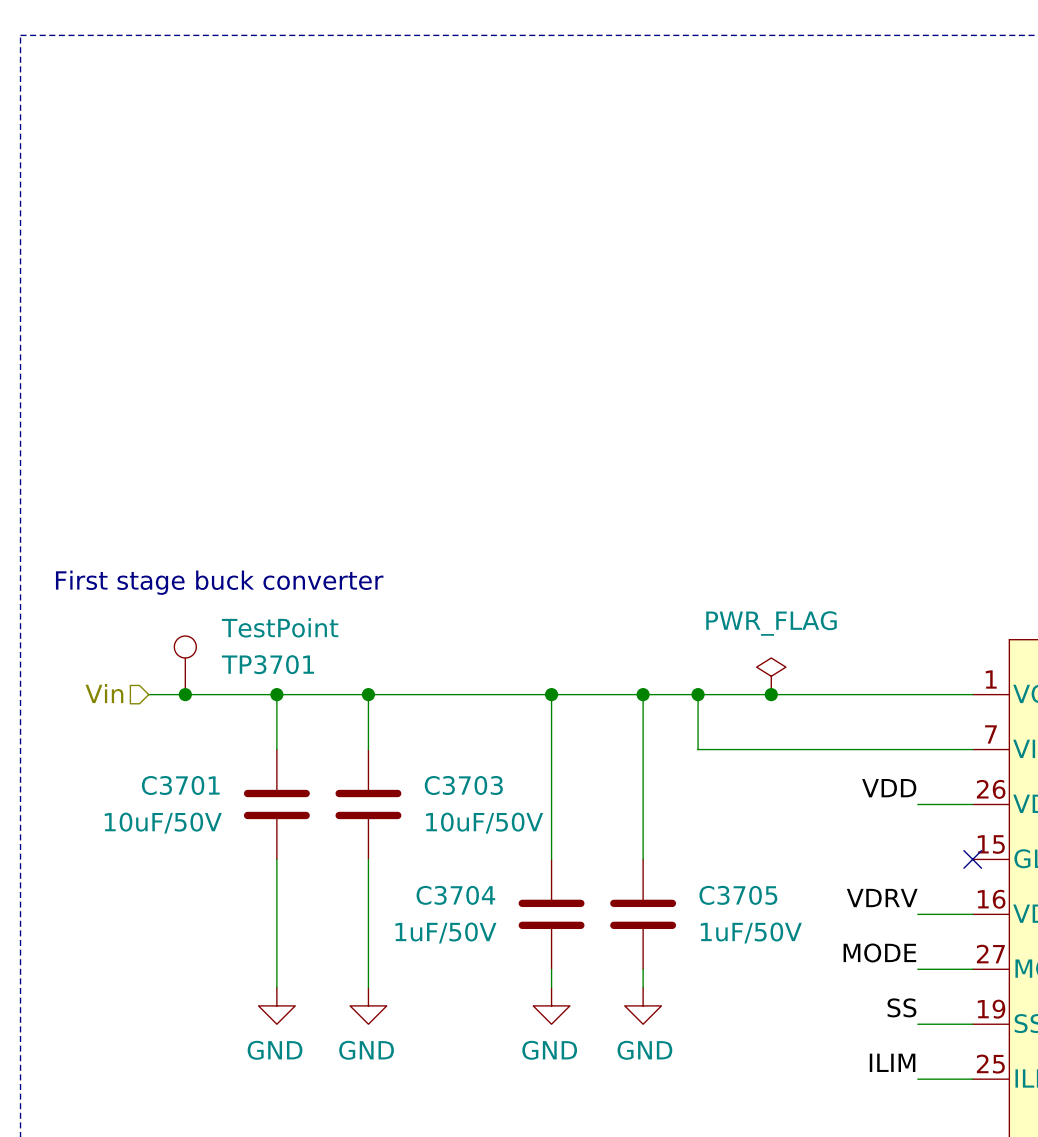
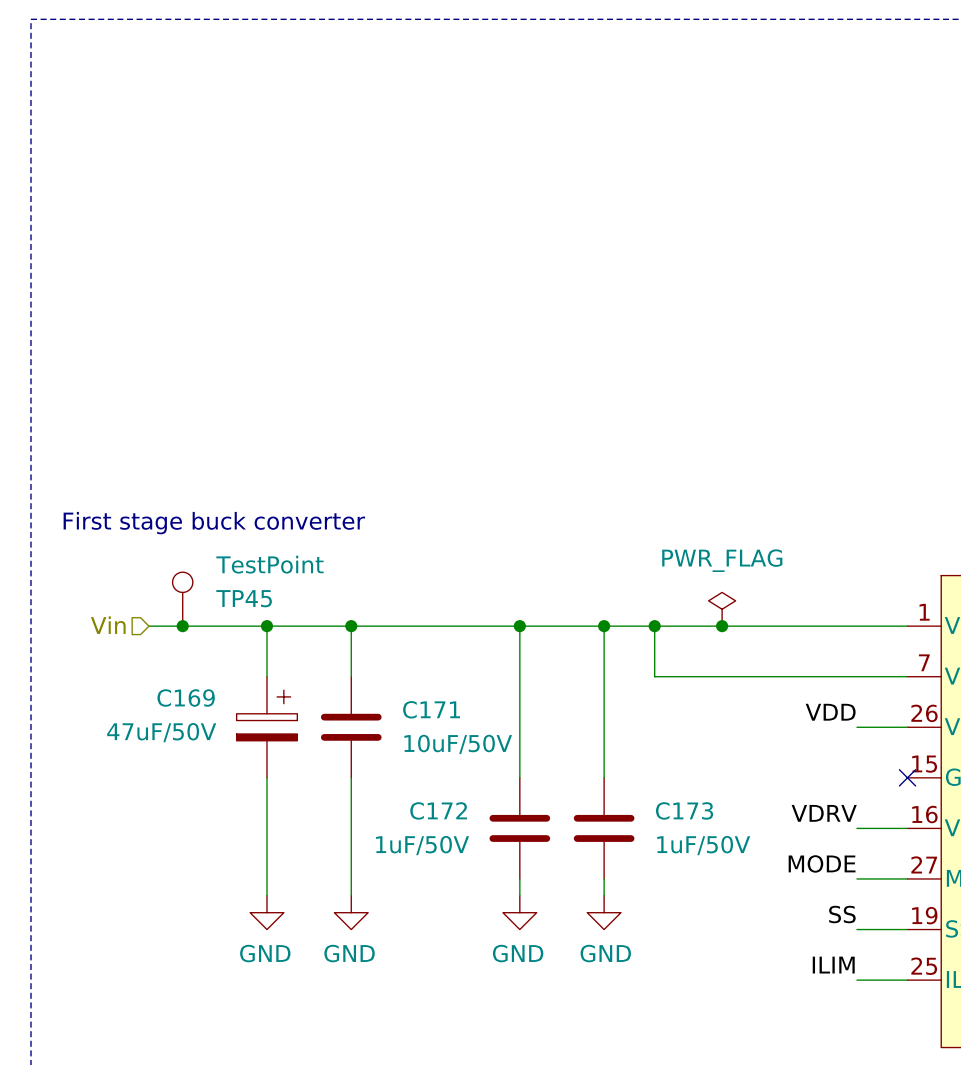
TP3701 name: TP3701 (267, 664) -> TP45 (244, 598)
C3703 name: C3703 (463, 785) -> C171 (431, 709)
C3701: 10uF/50V (276, 804) -> none
C169: none -> 47uF/50V (266, 727)
C3704 name: C3704 (455, 895) -> C172 (438, 810)
C3705 name: C3705 (738, 895) -> C173 (684, 810)

